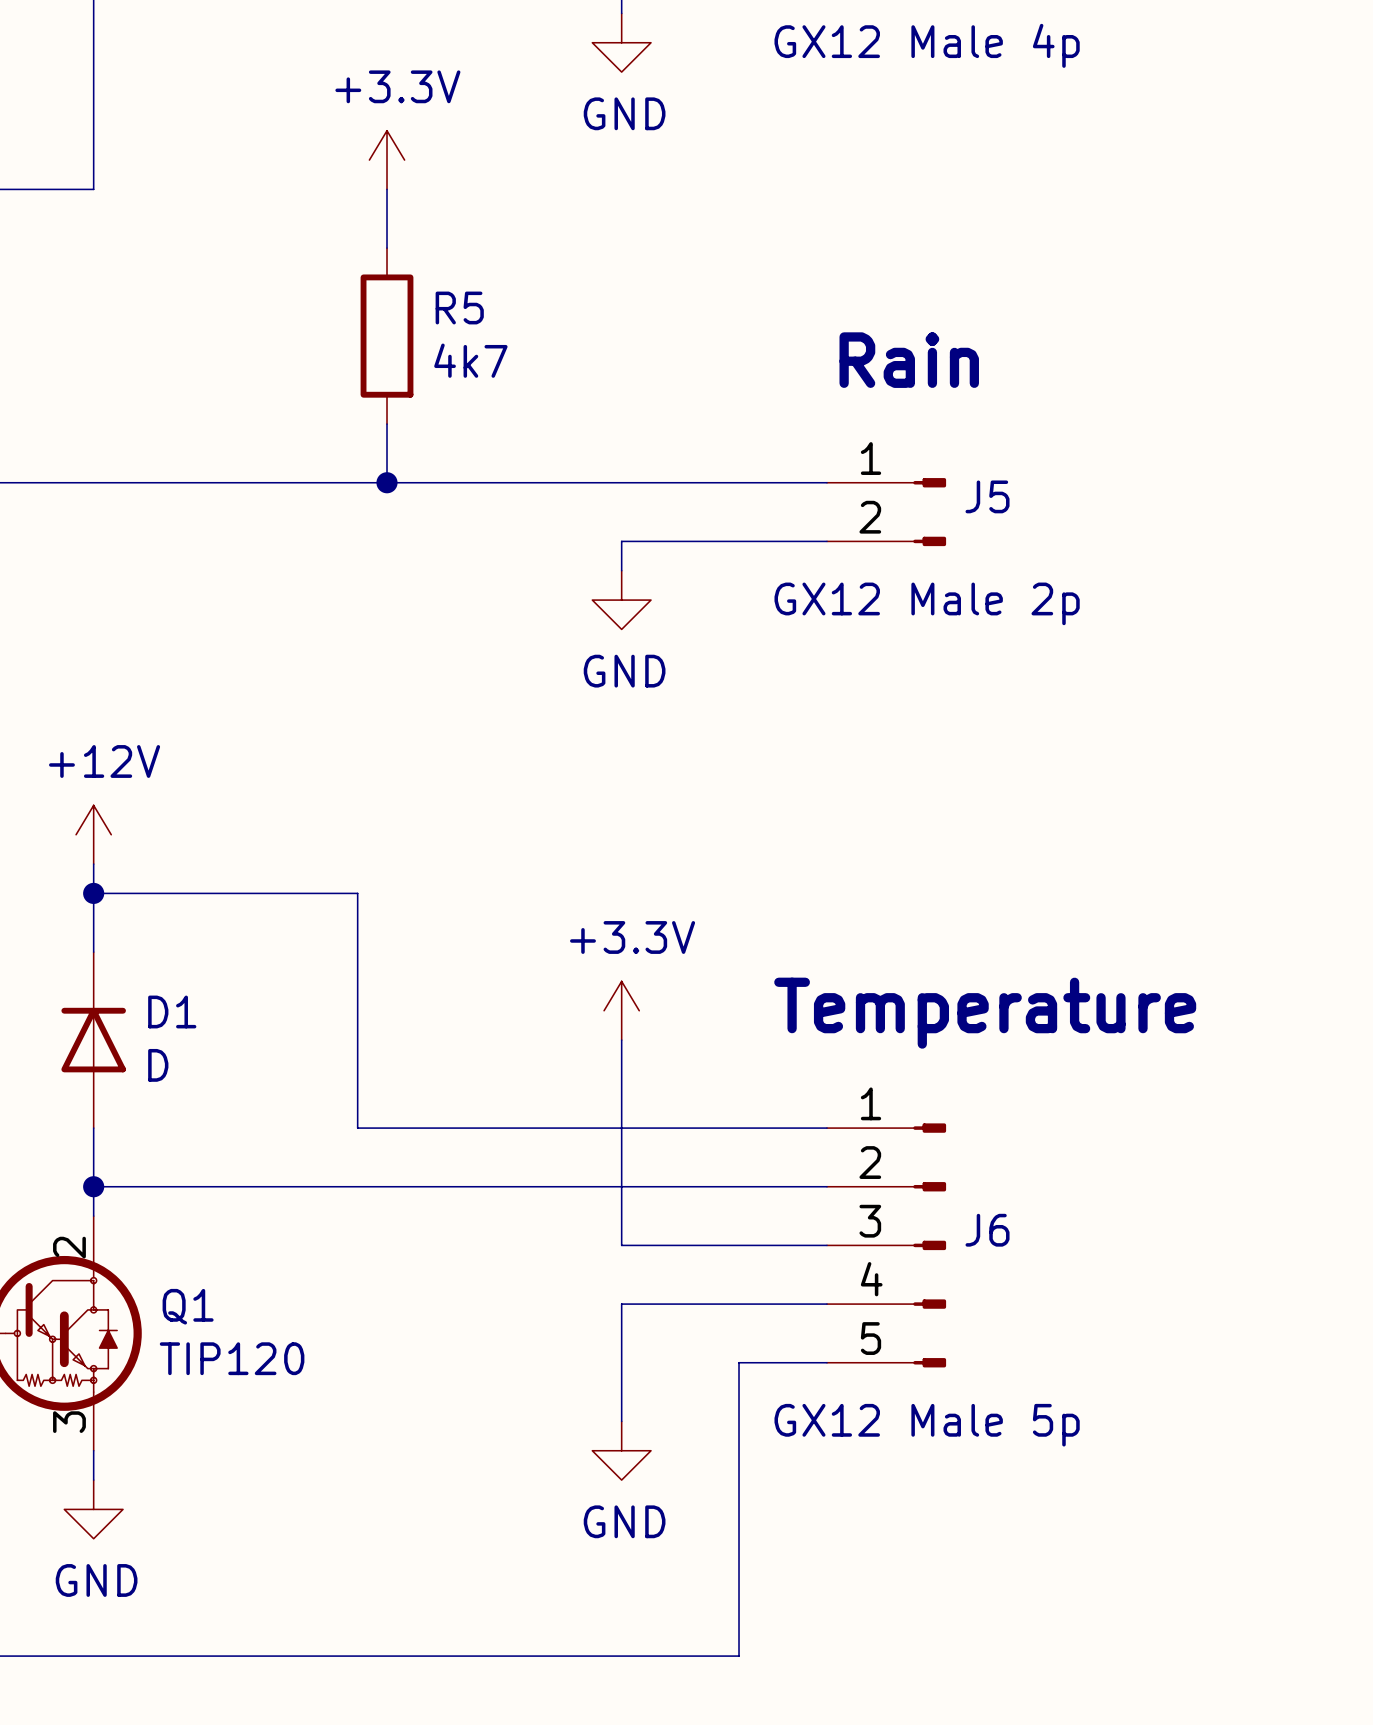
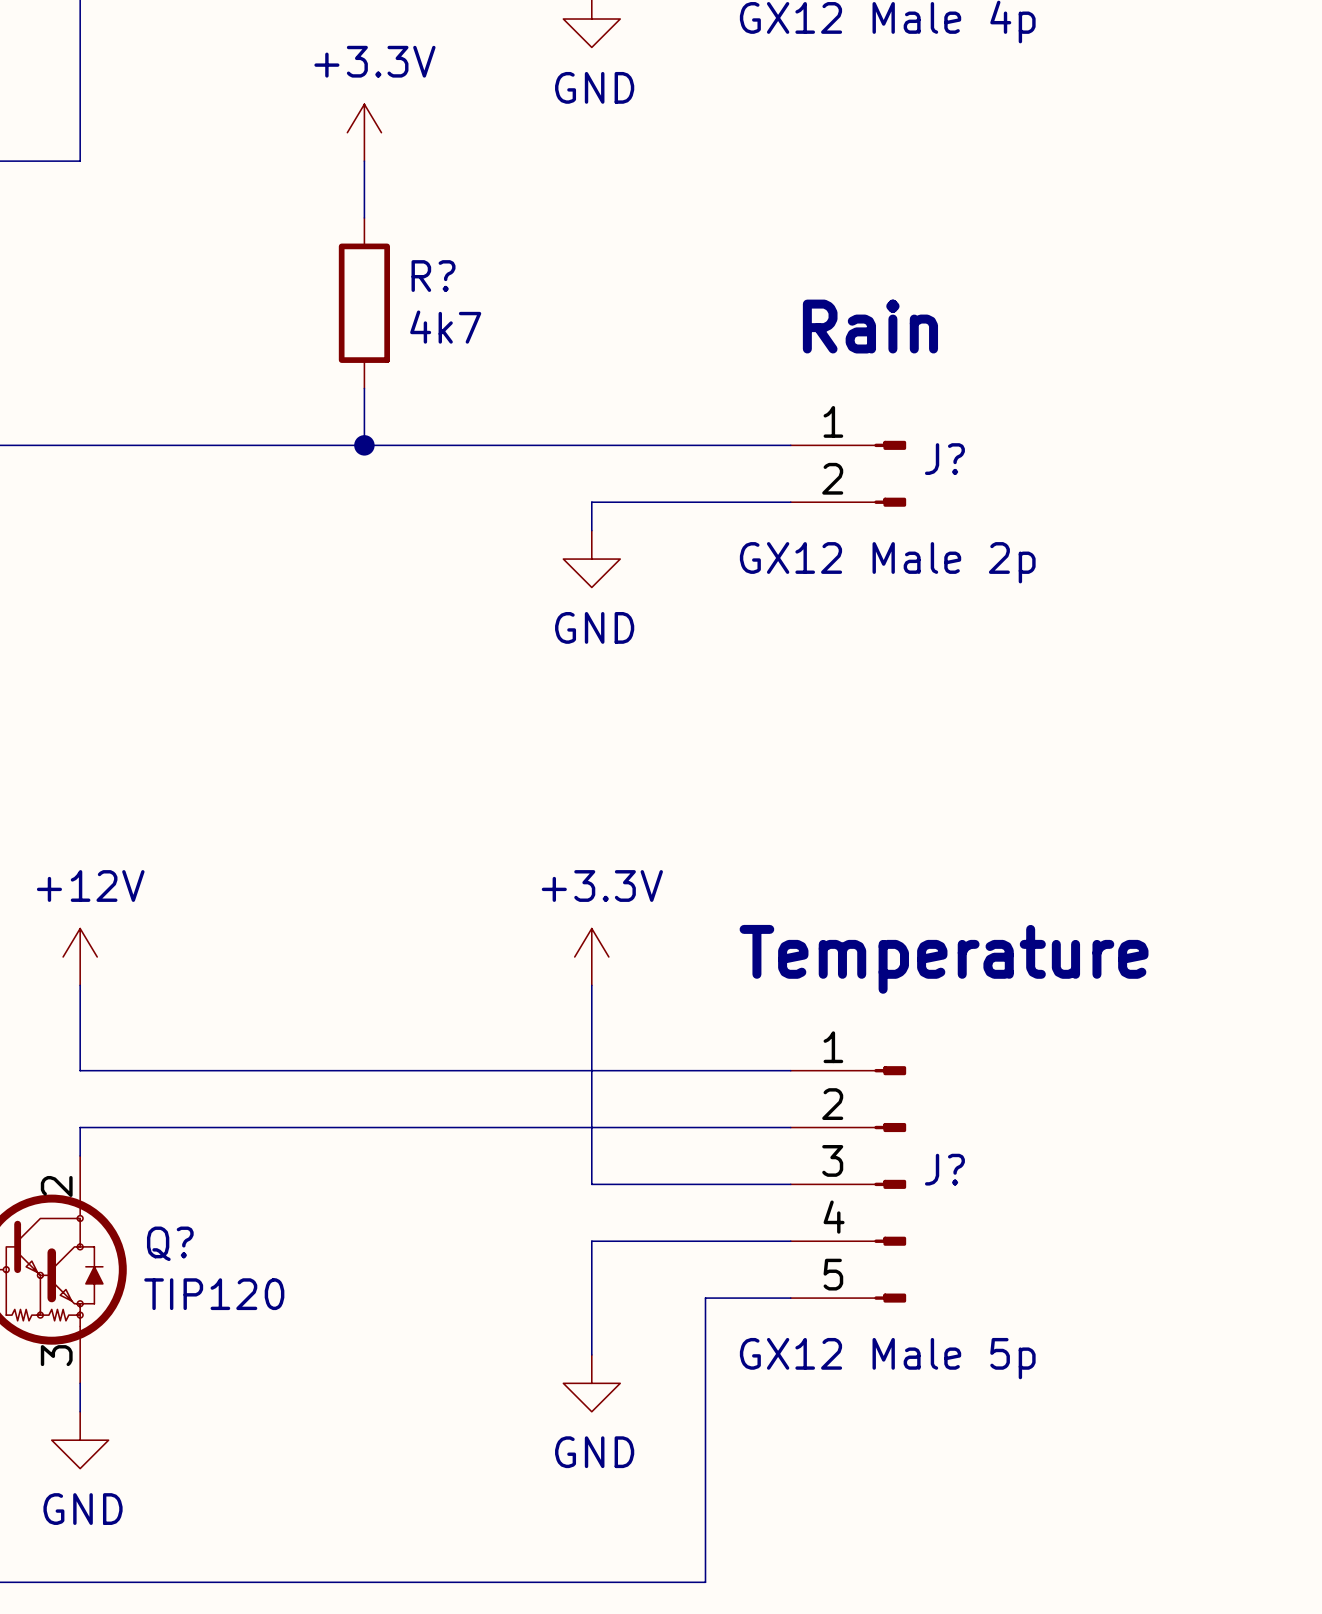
R5 name: R5 (459, 307) -> R? (433, 276)
J5 name: J5 (987, 496) -> J? (944, 459)
power symbol position: +12V (93, 834) -> +12V (80, 956)
wire: (93, 864) (93, 952) -> none
wire: (93, 893) (357, 893) (357, 1128) -> (80, 985) (80, 1070) (335, 1070)
junction: (93, 893) -> none
D1: D (93, 1040) -> none
wire: (93, 1128) (93, 1186) -> none
junction: (93, 1186) -> none
J6 name: J6 (987, 1230) -> J? (944, 1169)
Q1 name: Q1 (188, 1306) -> Q? (170, 1243)

